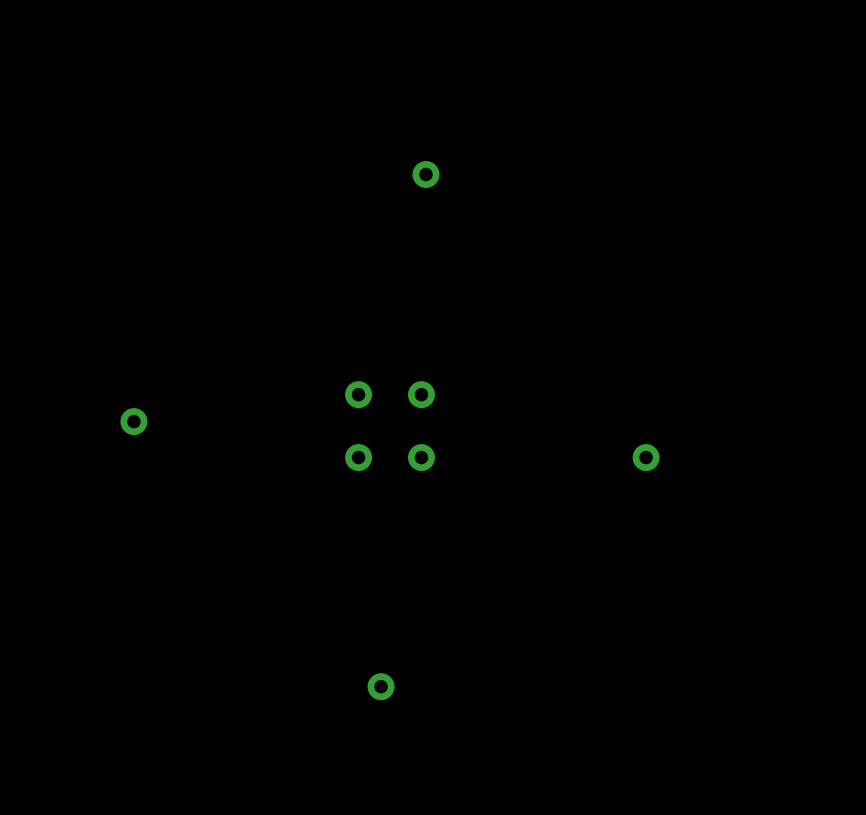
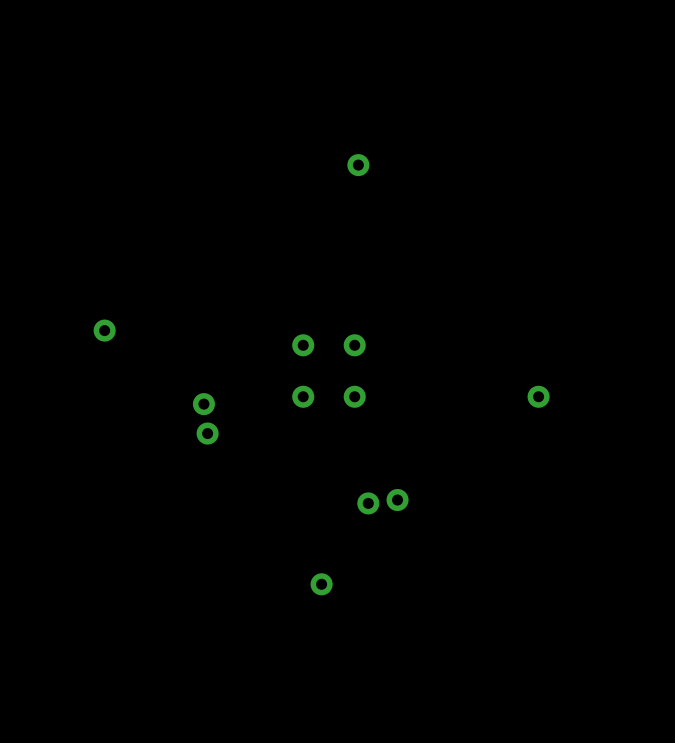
via position: (133, 421) -> (104, 330)
via: none -> (203, 404)
via: none -> (207, 433)
via: none -> (397, 500)
via: none -> (368, 503)

